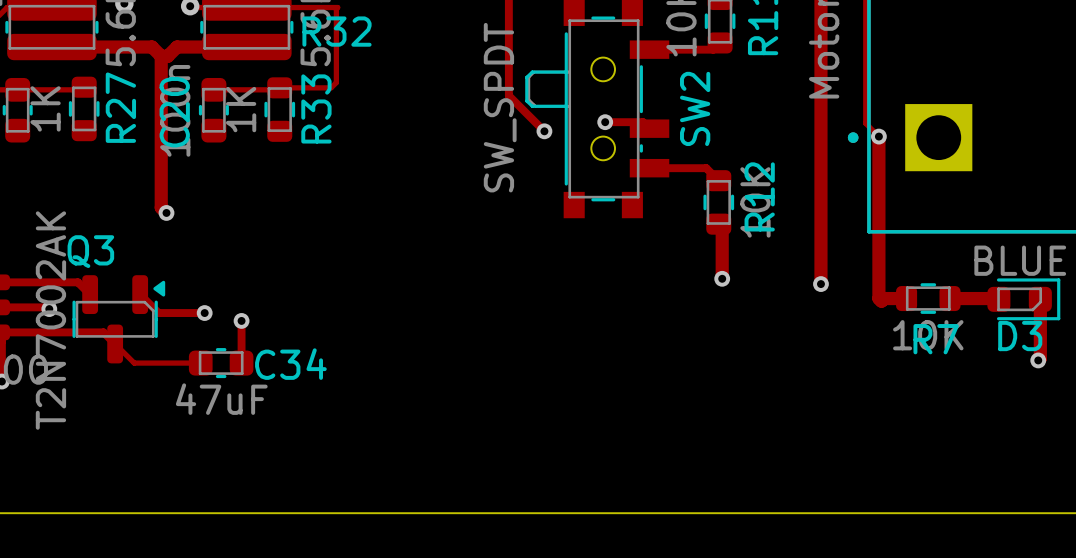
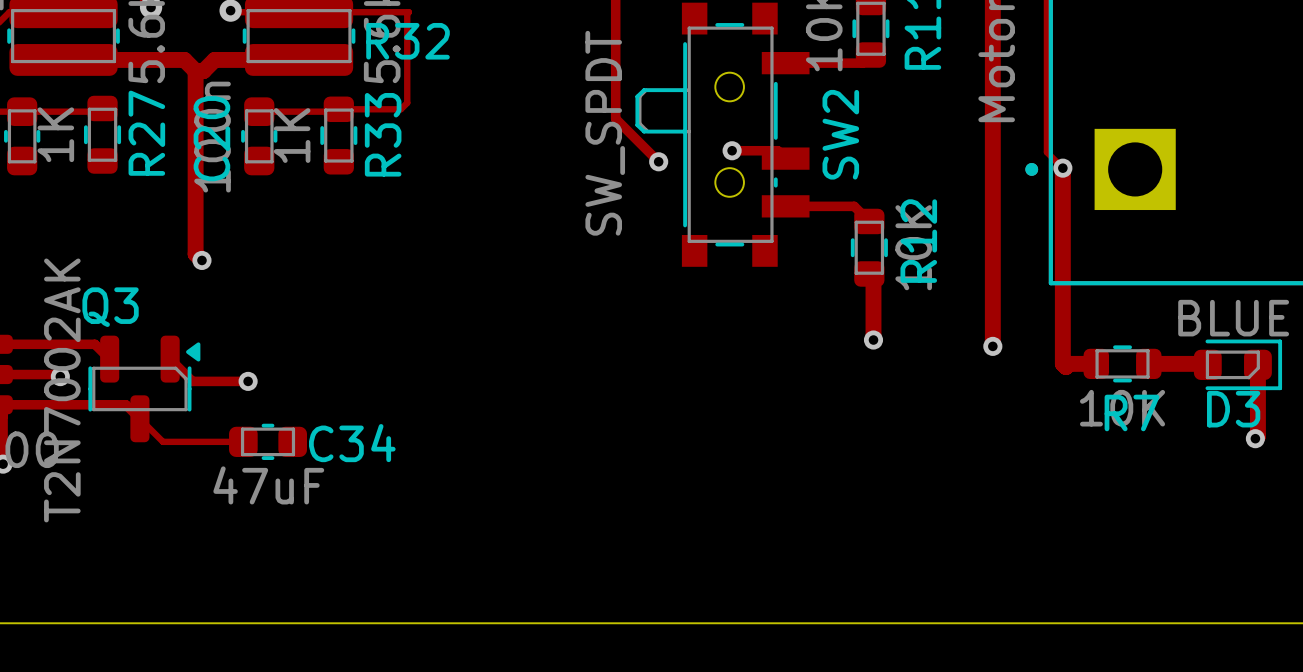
track: (241, 320) (241, 363) -> none
via: (241, 320) -> none

